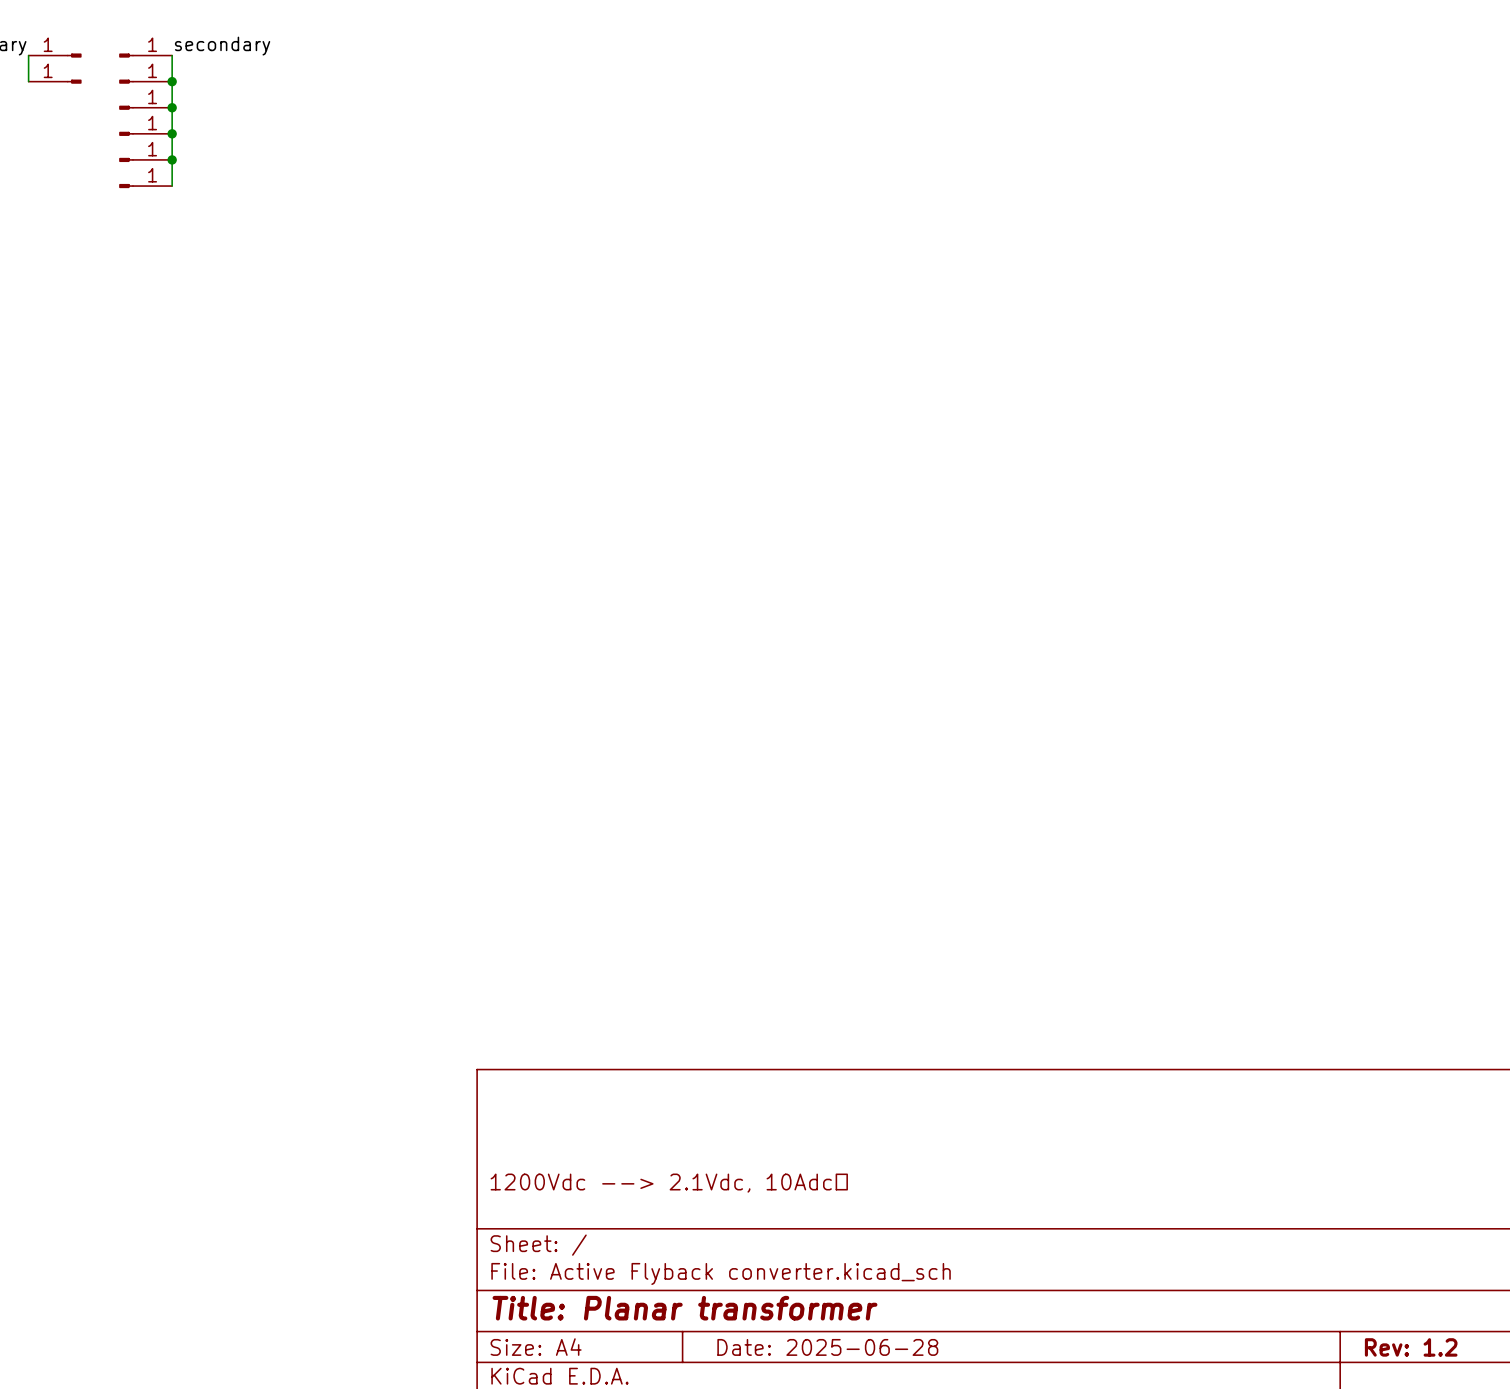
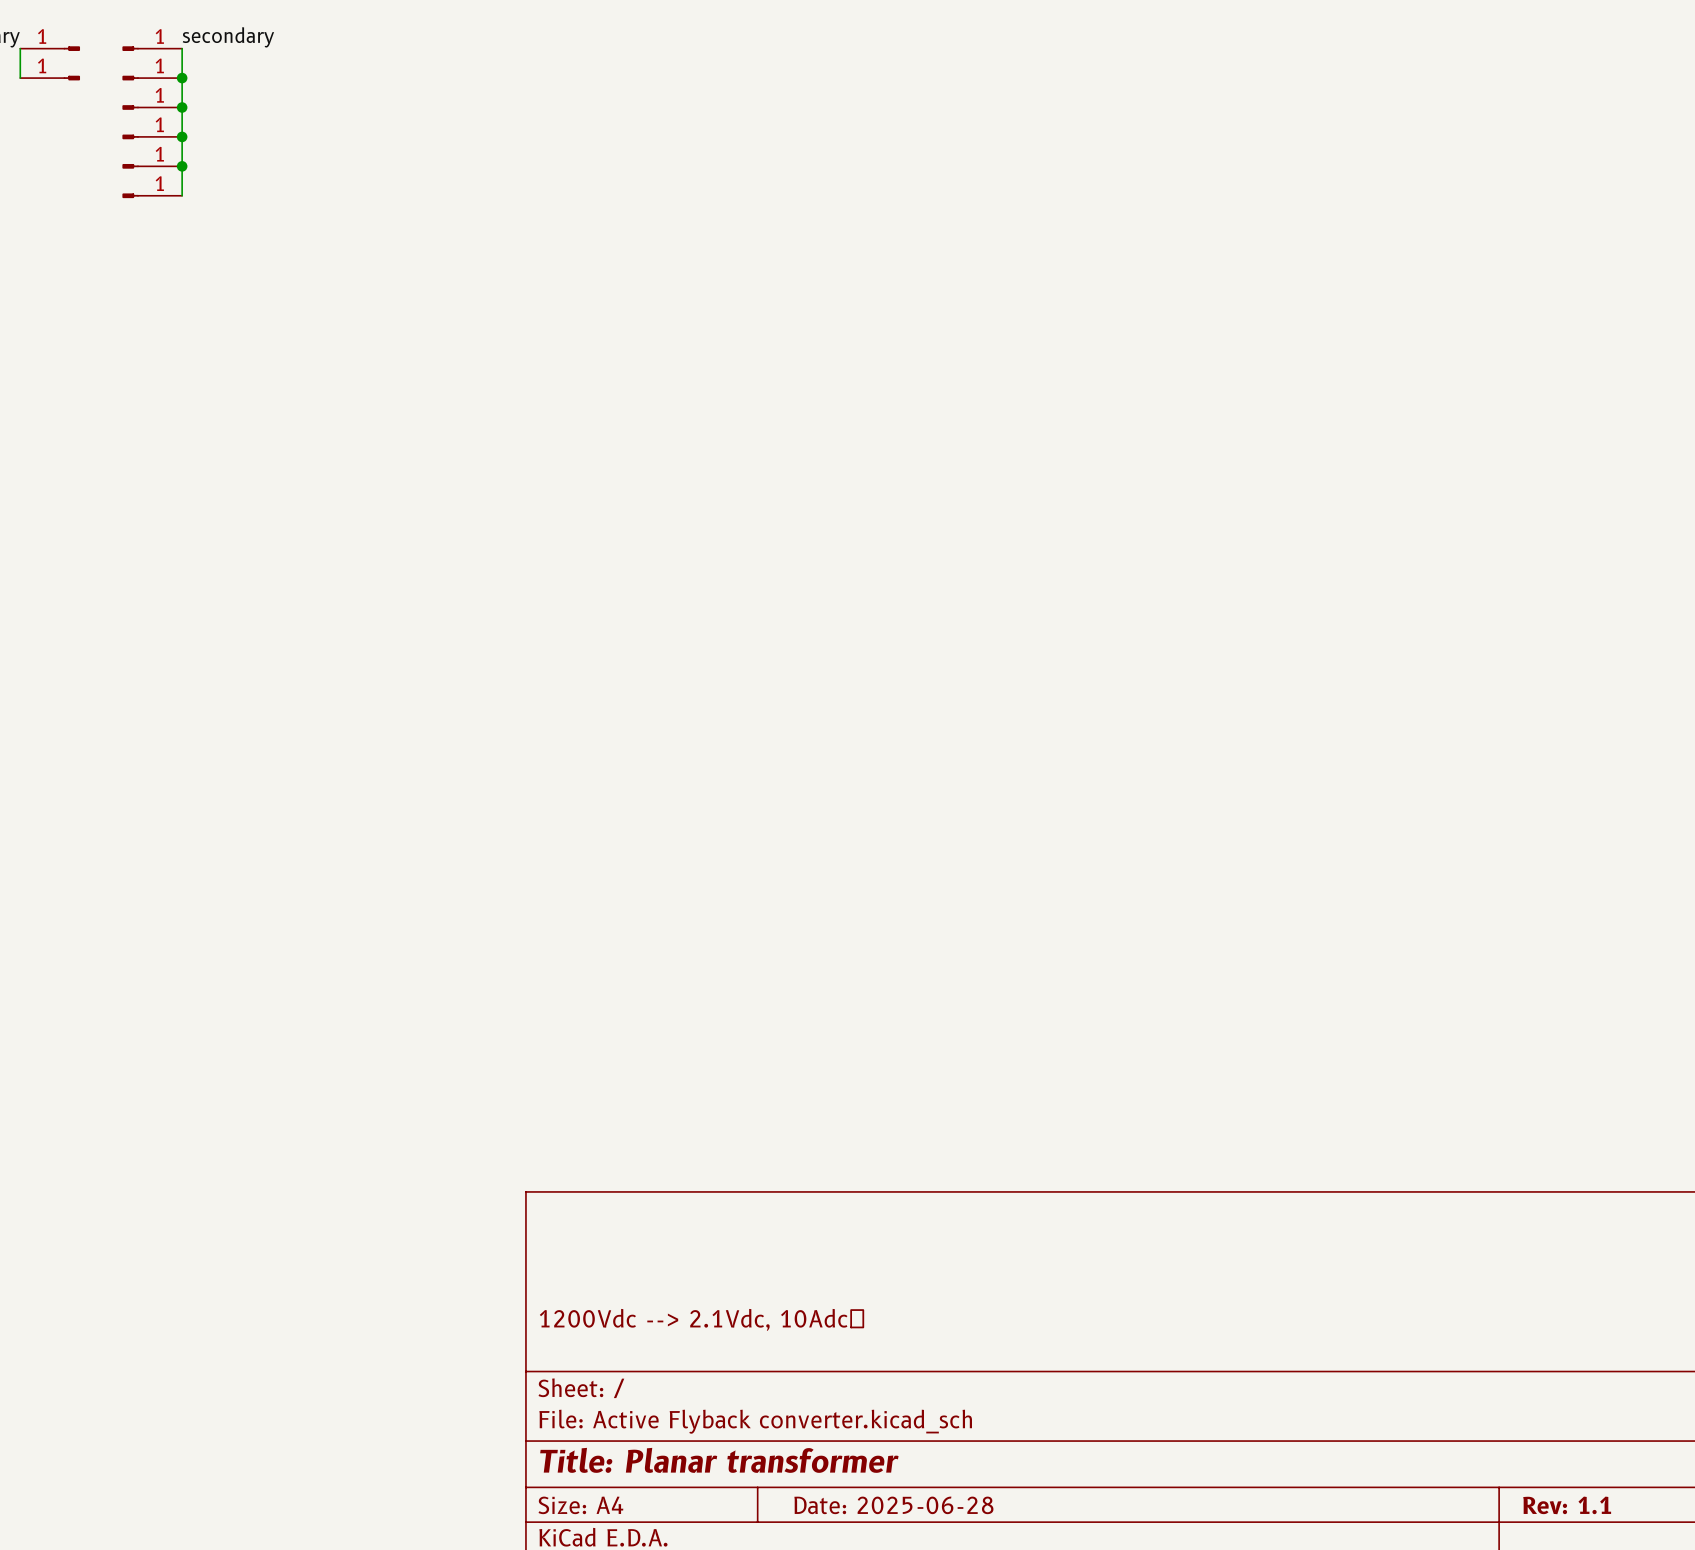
title block: Rev: 1.2 (1411, 1347) -> Rev: 1.1 (1567, 1505)

